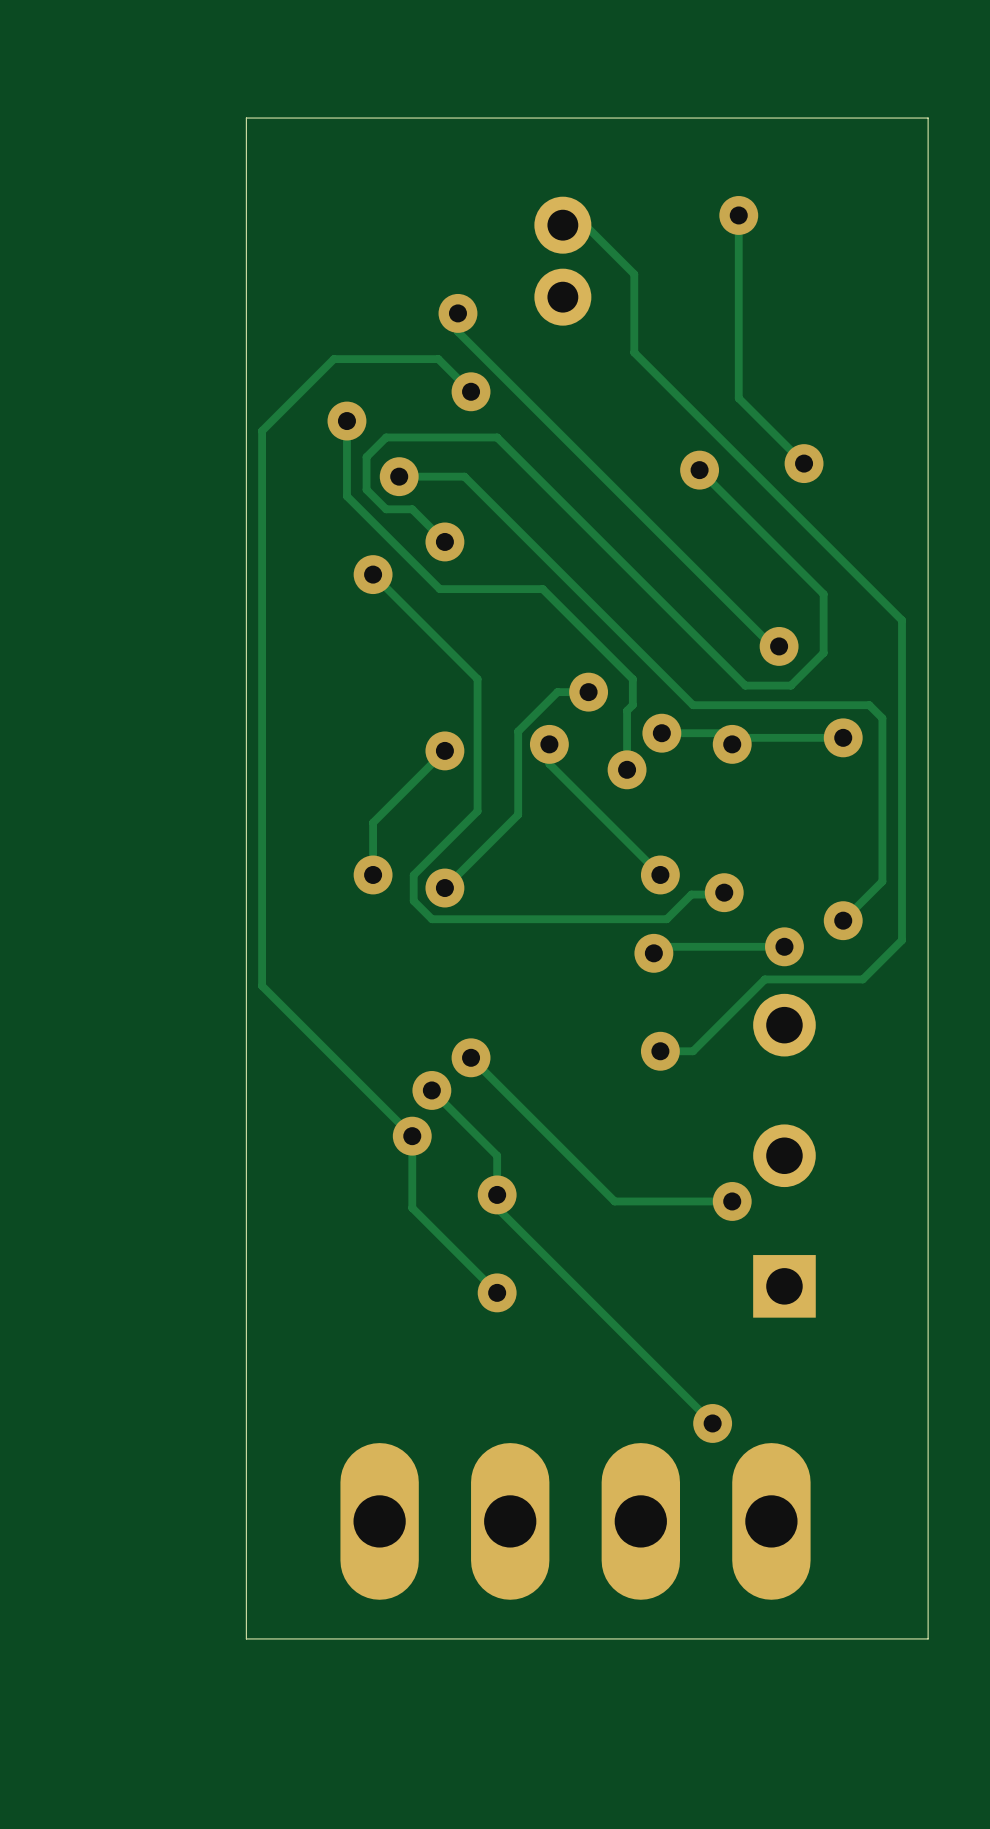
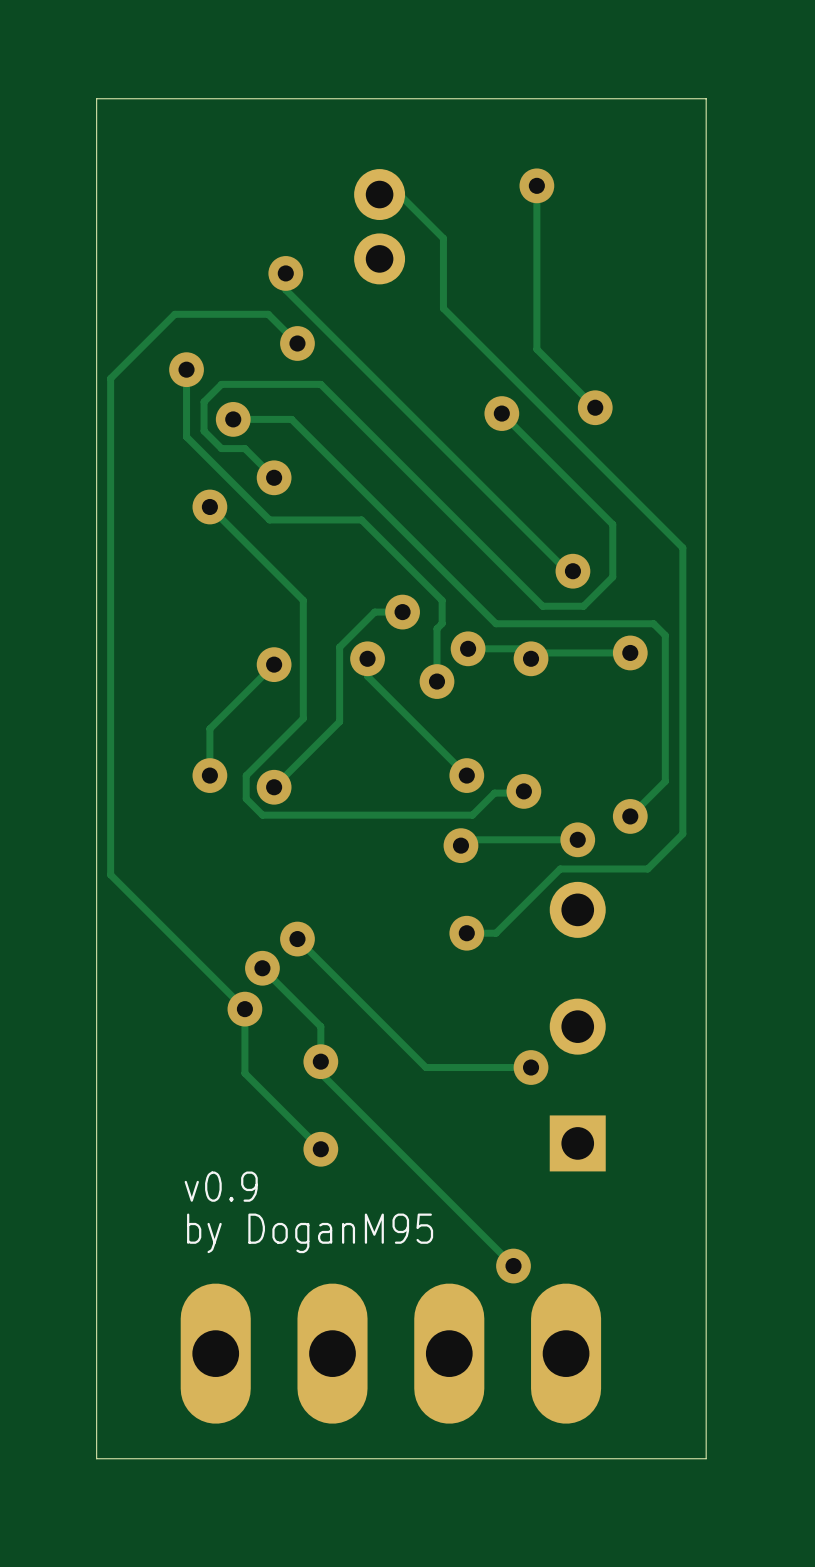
text: none -> v0.9 (221, 1186)
text: none -> by DoganM95 (310, 1233)

